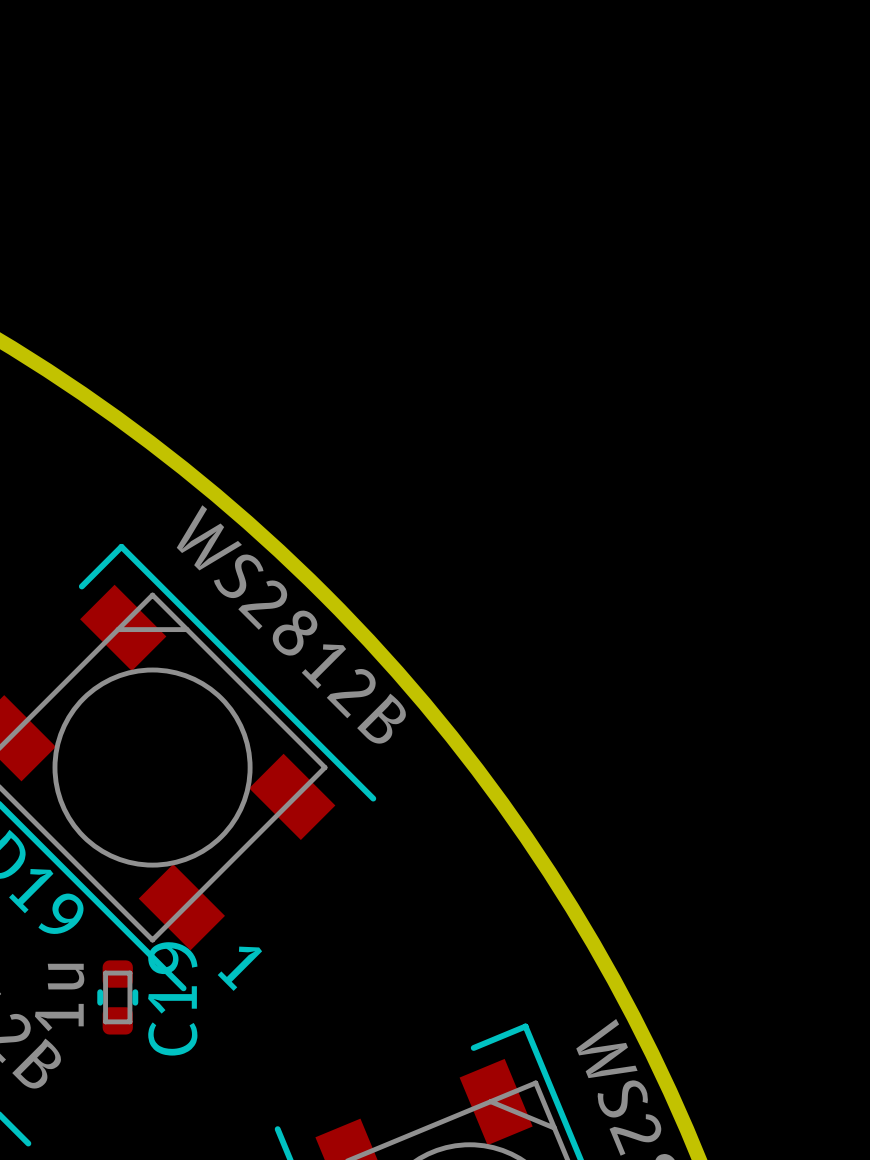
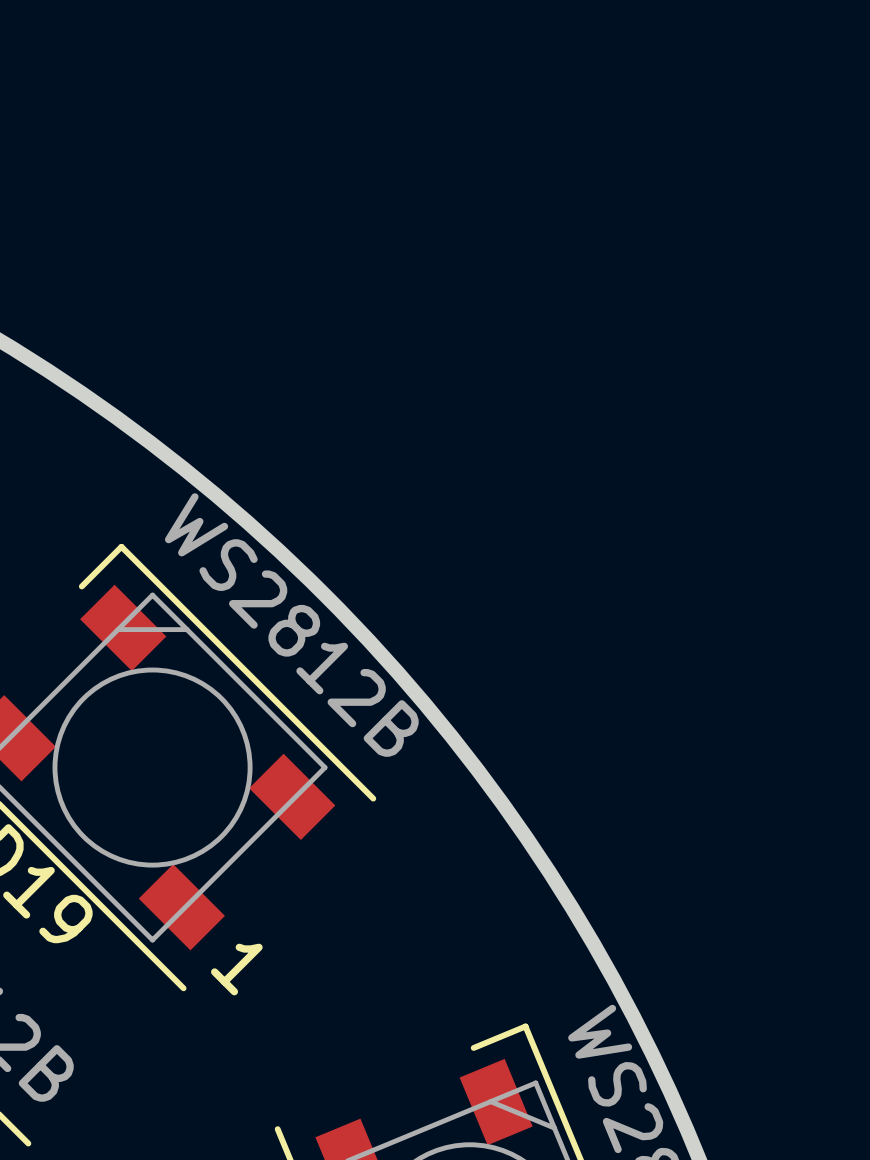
C19: 1u (117, 997) -> none

